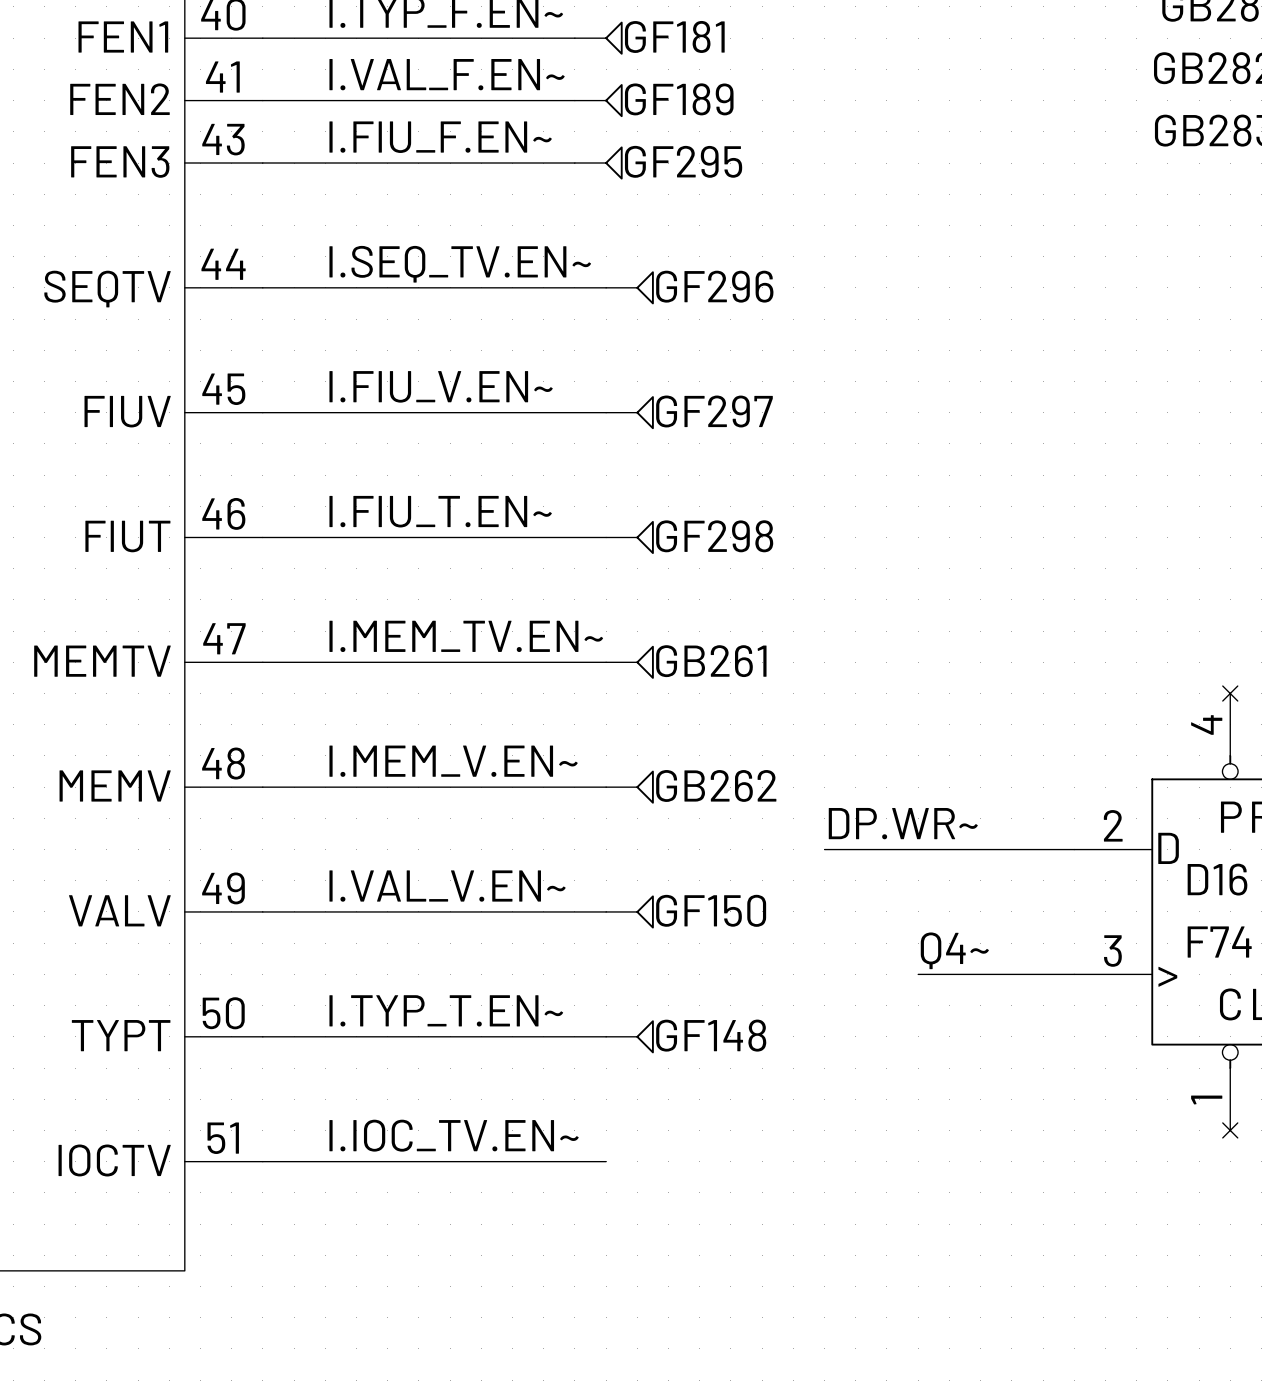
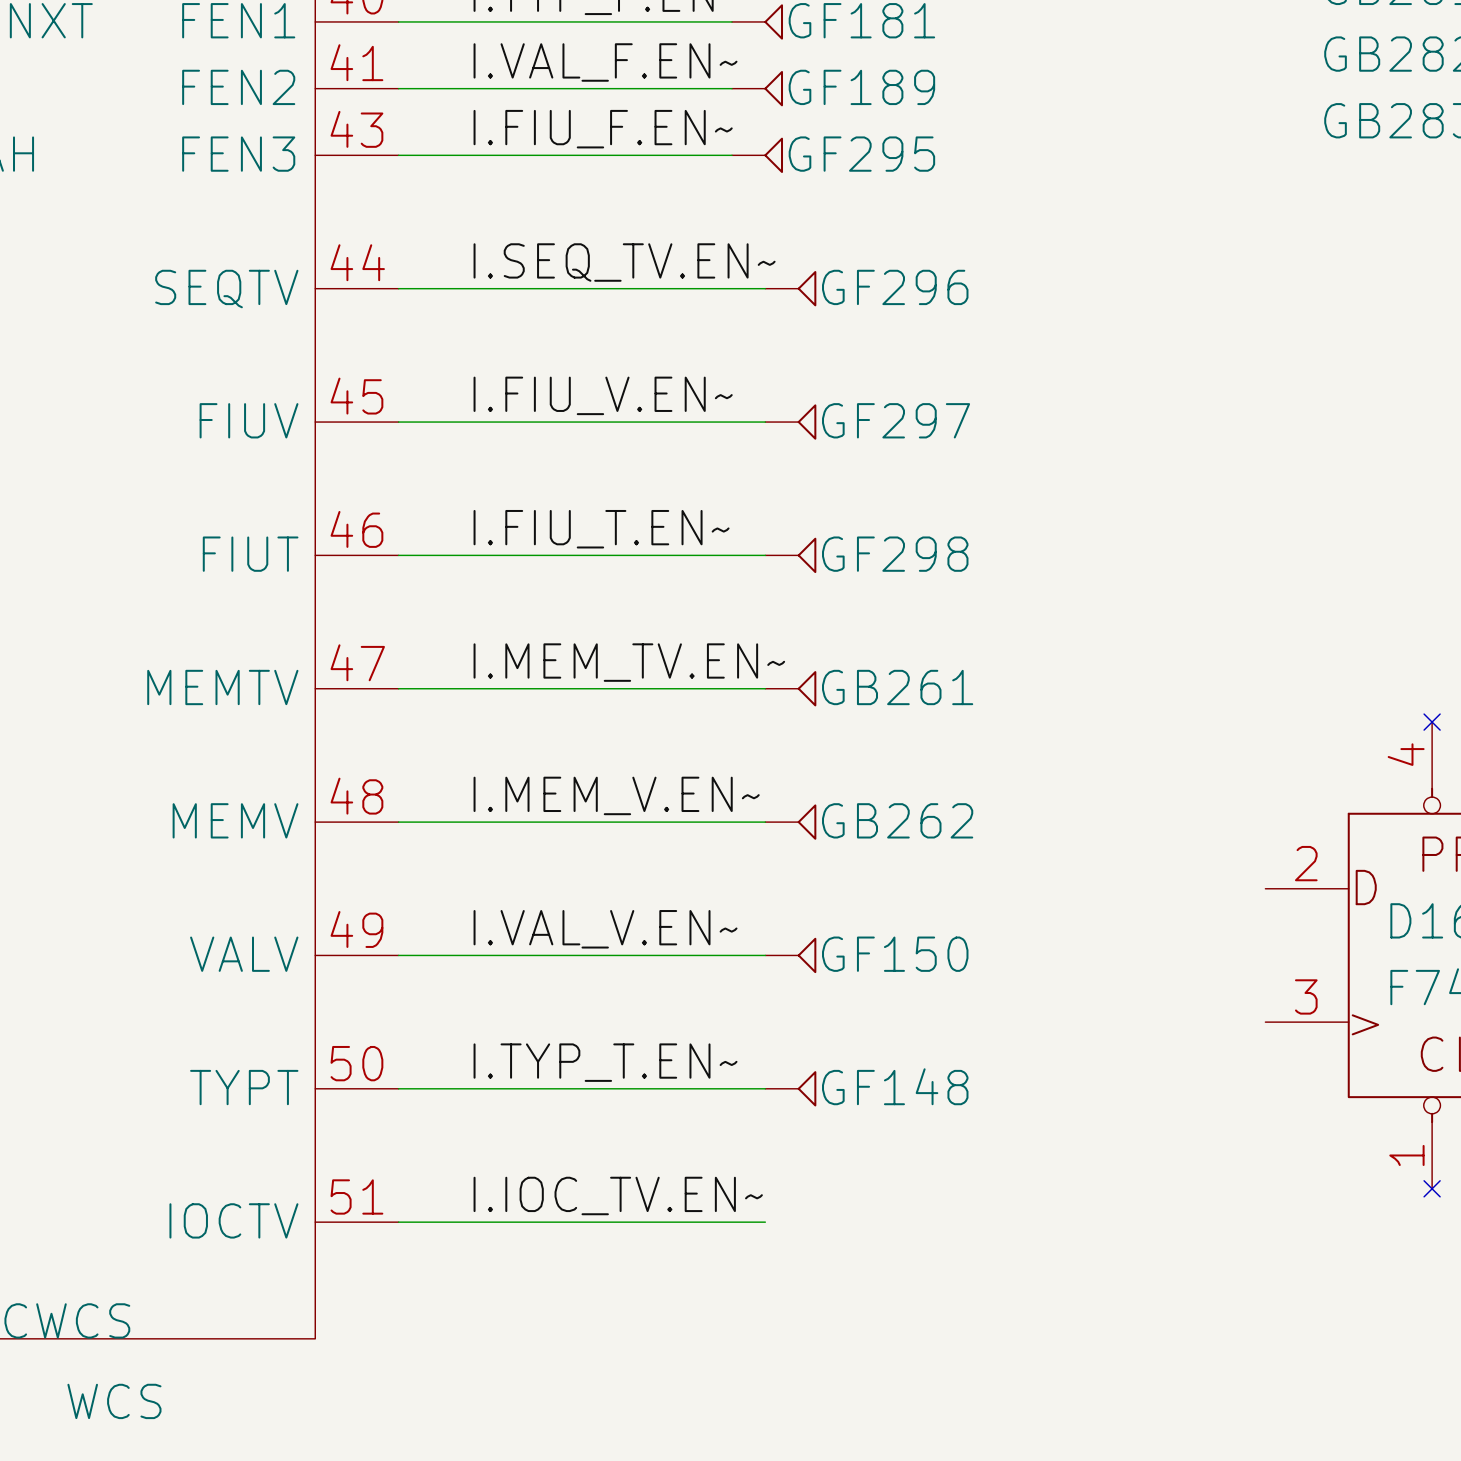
label: DP.WR~ (903, 823) -> none
wire: (824, 849) (1074, 849) -> none
label: Q4~ (954, 950) -> none
wire: (918, 974) (1074, 974) -> none

